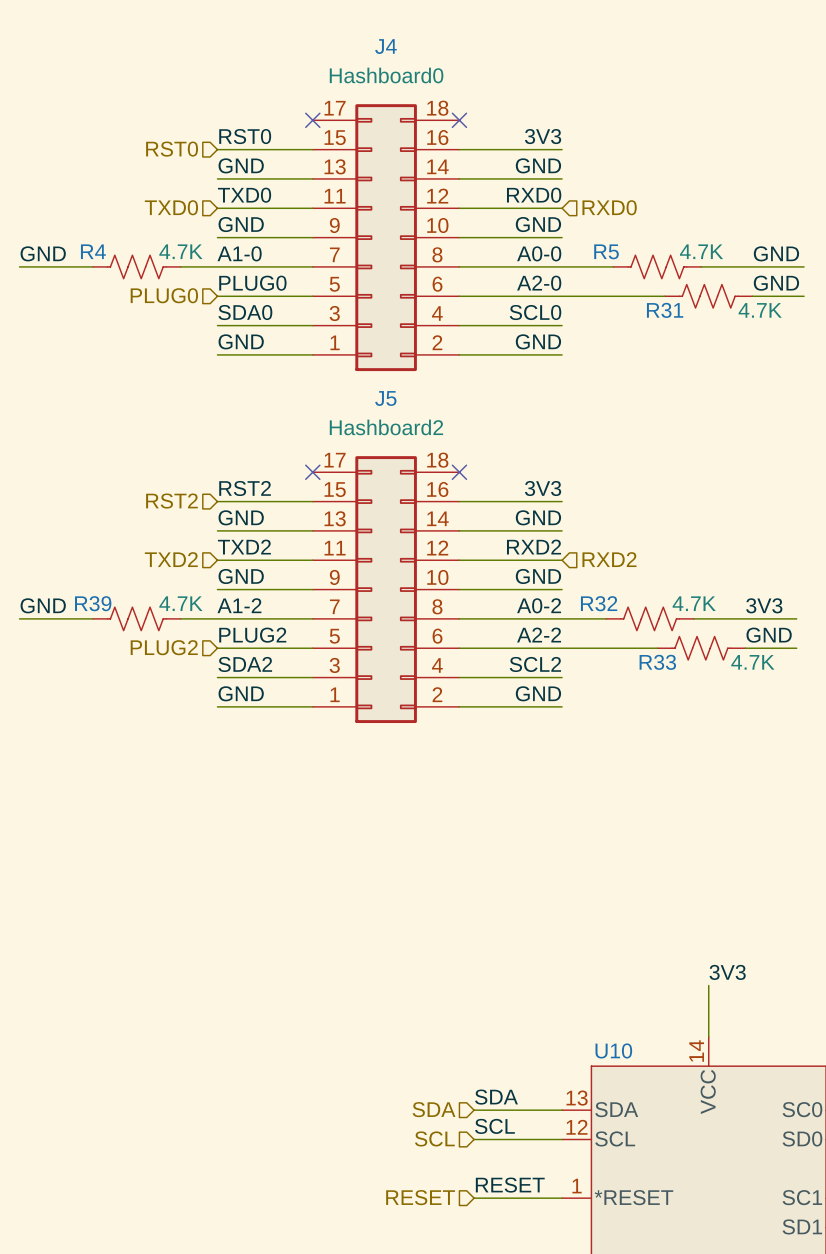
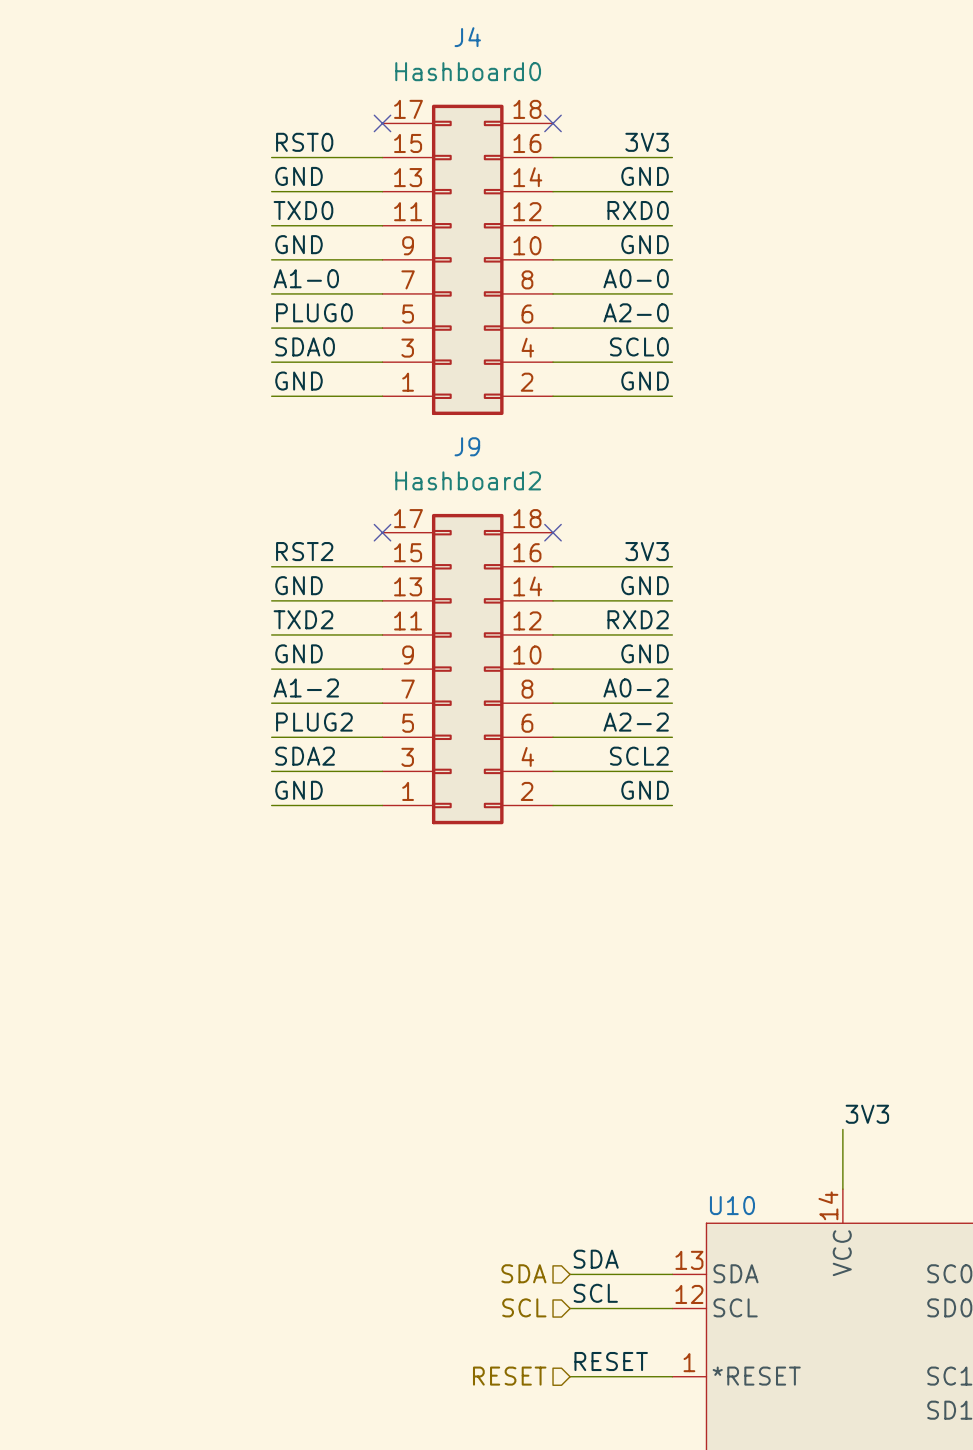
hierarchical label: RST0 (172, 149) -> none
hierarchical label: TXD0 (171, 207) -> none
hierarchical label: RXD0 (609, 207) -> none
label: GND (43, 253) -> none
label: GND (776, 253) -> none
wire: (19, 266) (92, 266) -> none
R4: 4.7K (136, 266) -> none
wire: (180, 266) (217, 266) -> none
wire: (562, 266) (613, 266) -> none
R5: 4.7K (657, 266) -> none
wire: (701, 266) (804, 266) -> none
label: GND (776, 283) -> none
hierarchical label: PLUG0 (164, 295) -> none
wire: (562, 296) (664, 296) -> none
R31: 4.7K (708, 296) -> none
wire: (752, 296) (804, 296) -> none
J5 name: J5 (385, 398) -> J9 (467, 446)
hierarchical label: RST2 (171, 501) -> none
hierarchical label: TXD2 (171, 559) -> none
hierarchical label: RXD2 (609, 559) -> none
label: GND (43, 605) -> none
label: 3V3 (764, 605) -> none
wire: (19, 618) (92, 618) -> none
R39: 4.7K (136, 618) -> none
wire: (180, 618) (217, 618) -> none
wire: (562, 618) (606, 618) -> none
R32: 4.7K (650, 618) -> none
wire: (694, 618) (796, 618) -> none
label: GND (769, 635) -> none
hierarchical label: PLUG2 (164, 647) -> none
wire: (562, 648) (657, 648) -> none
R33: 4.7K (701, 648) -> none
wire: (745, 648) (796, 648) -> none

